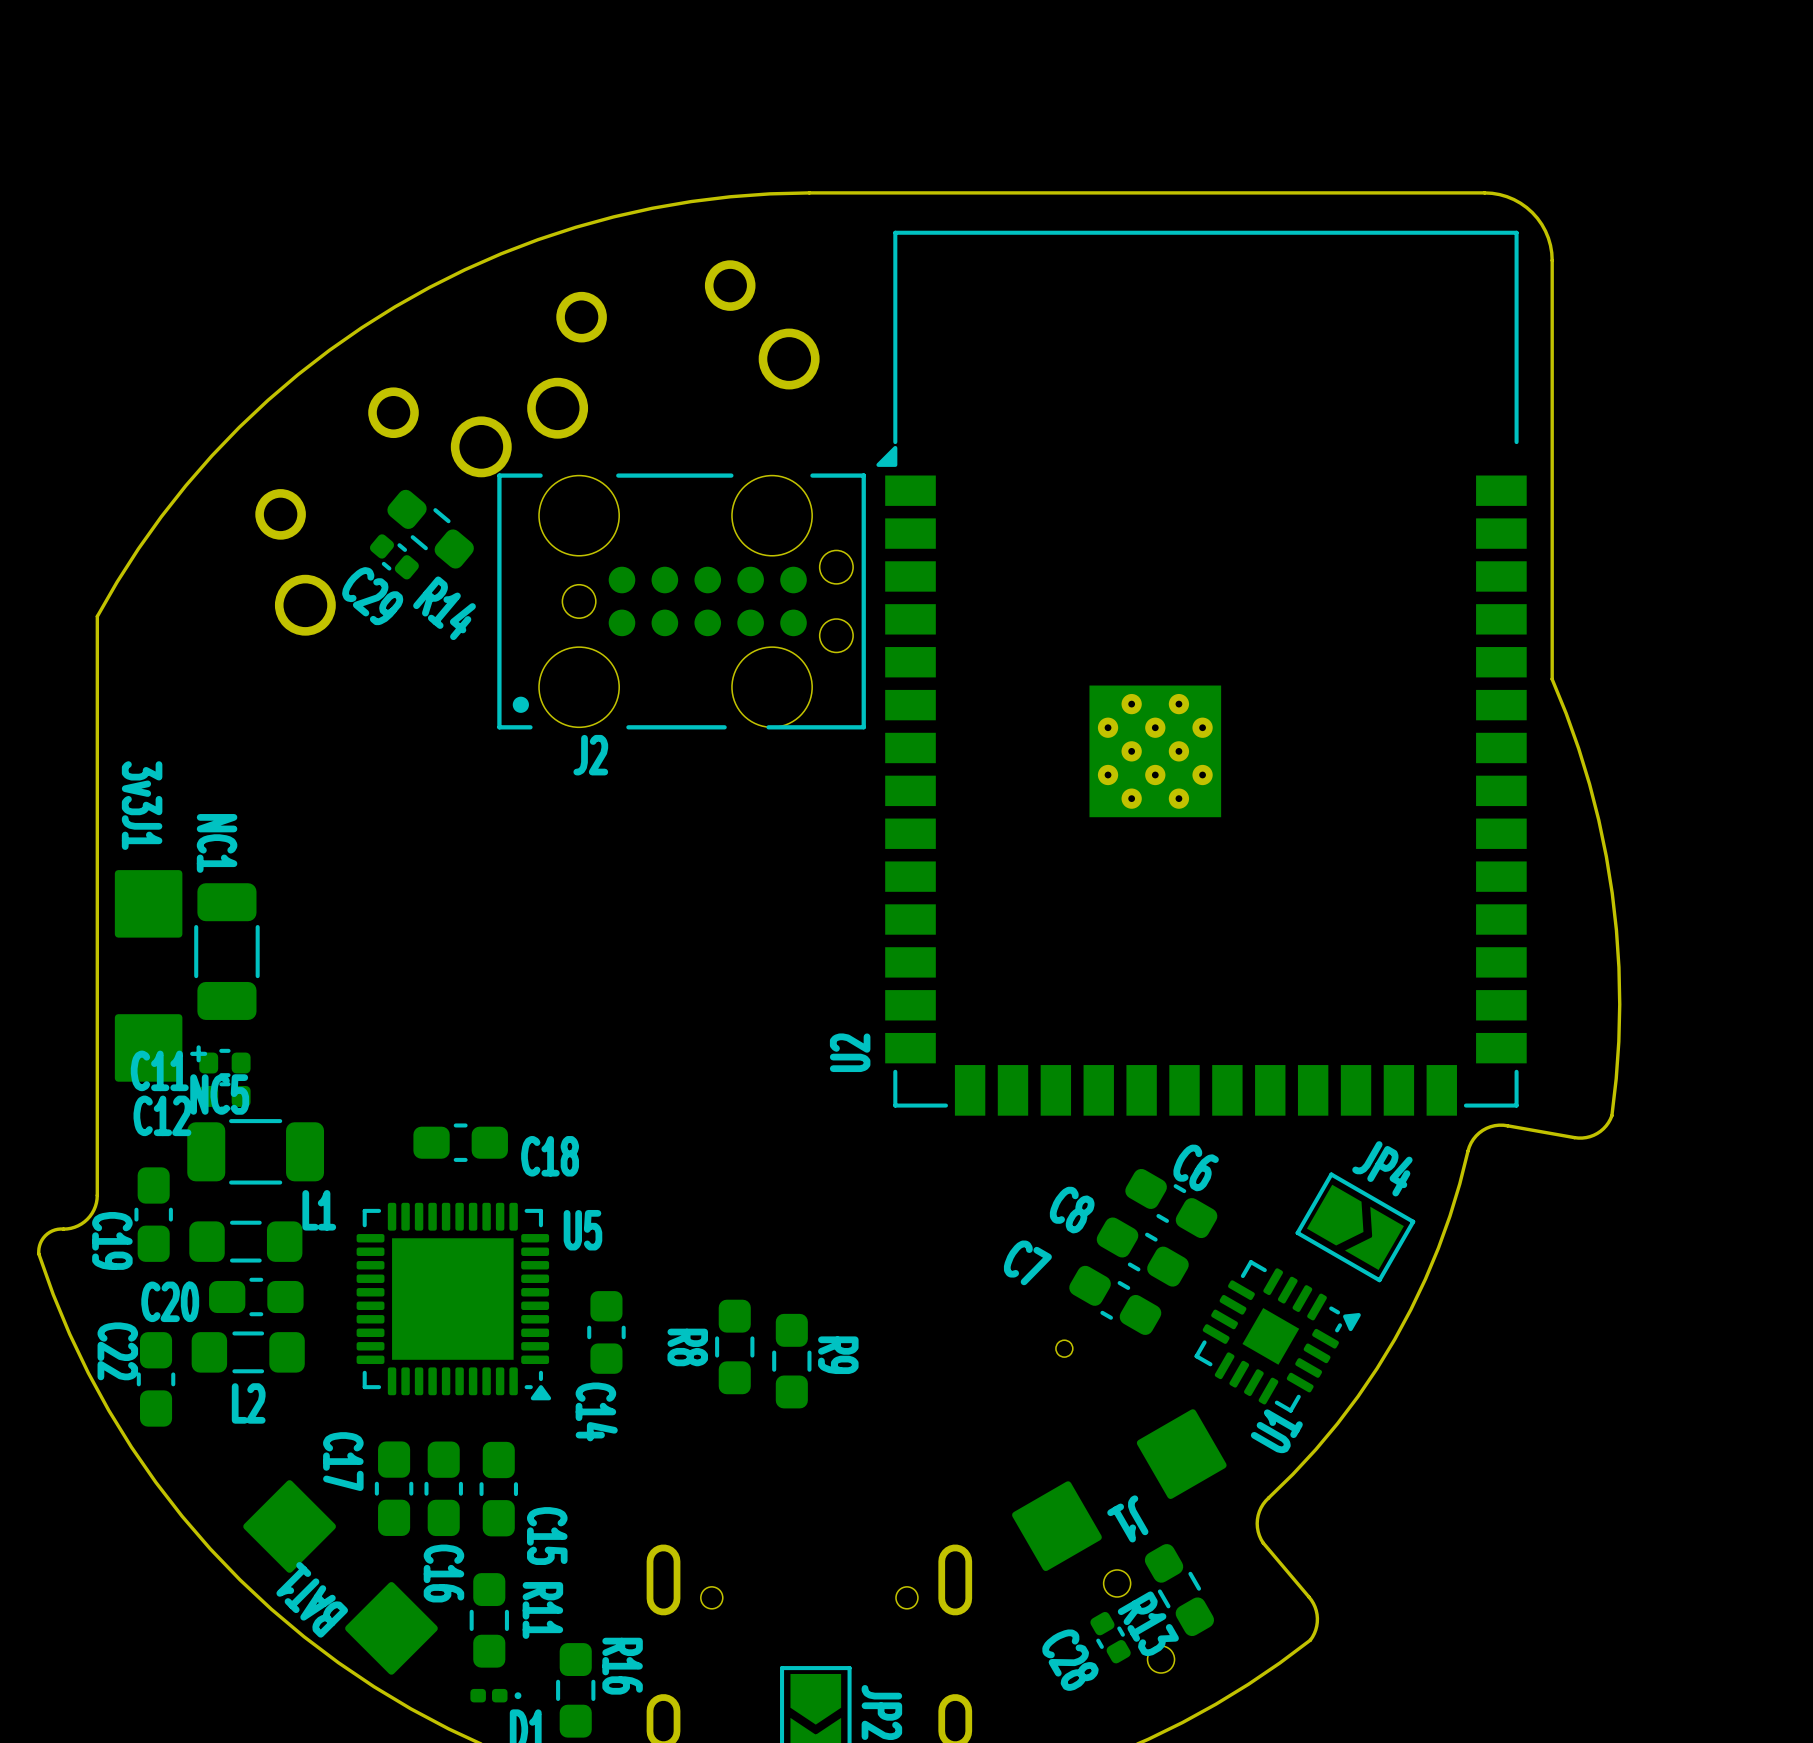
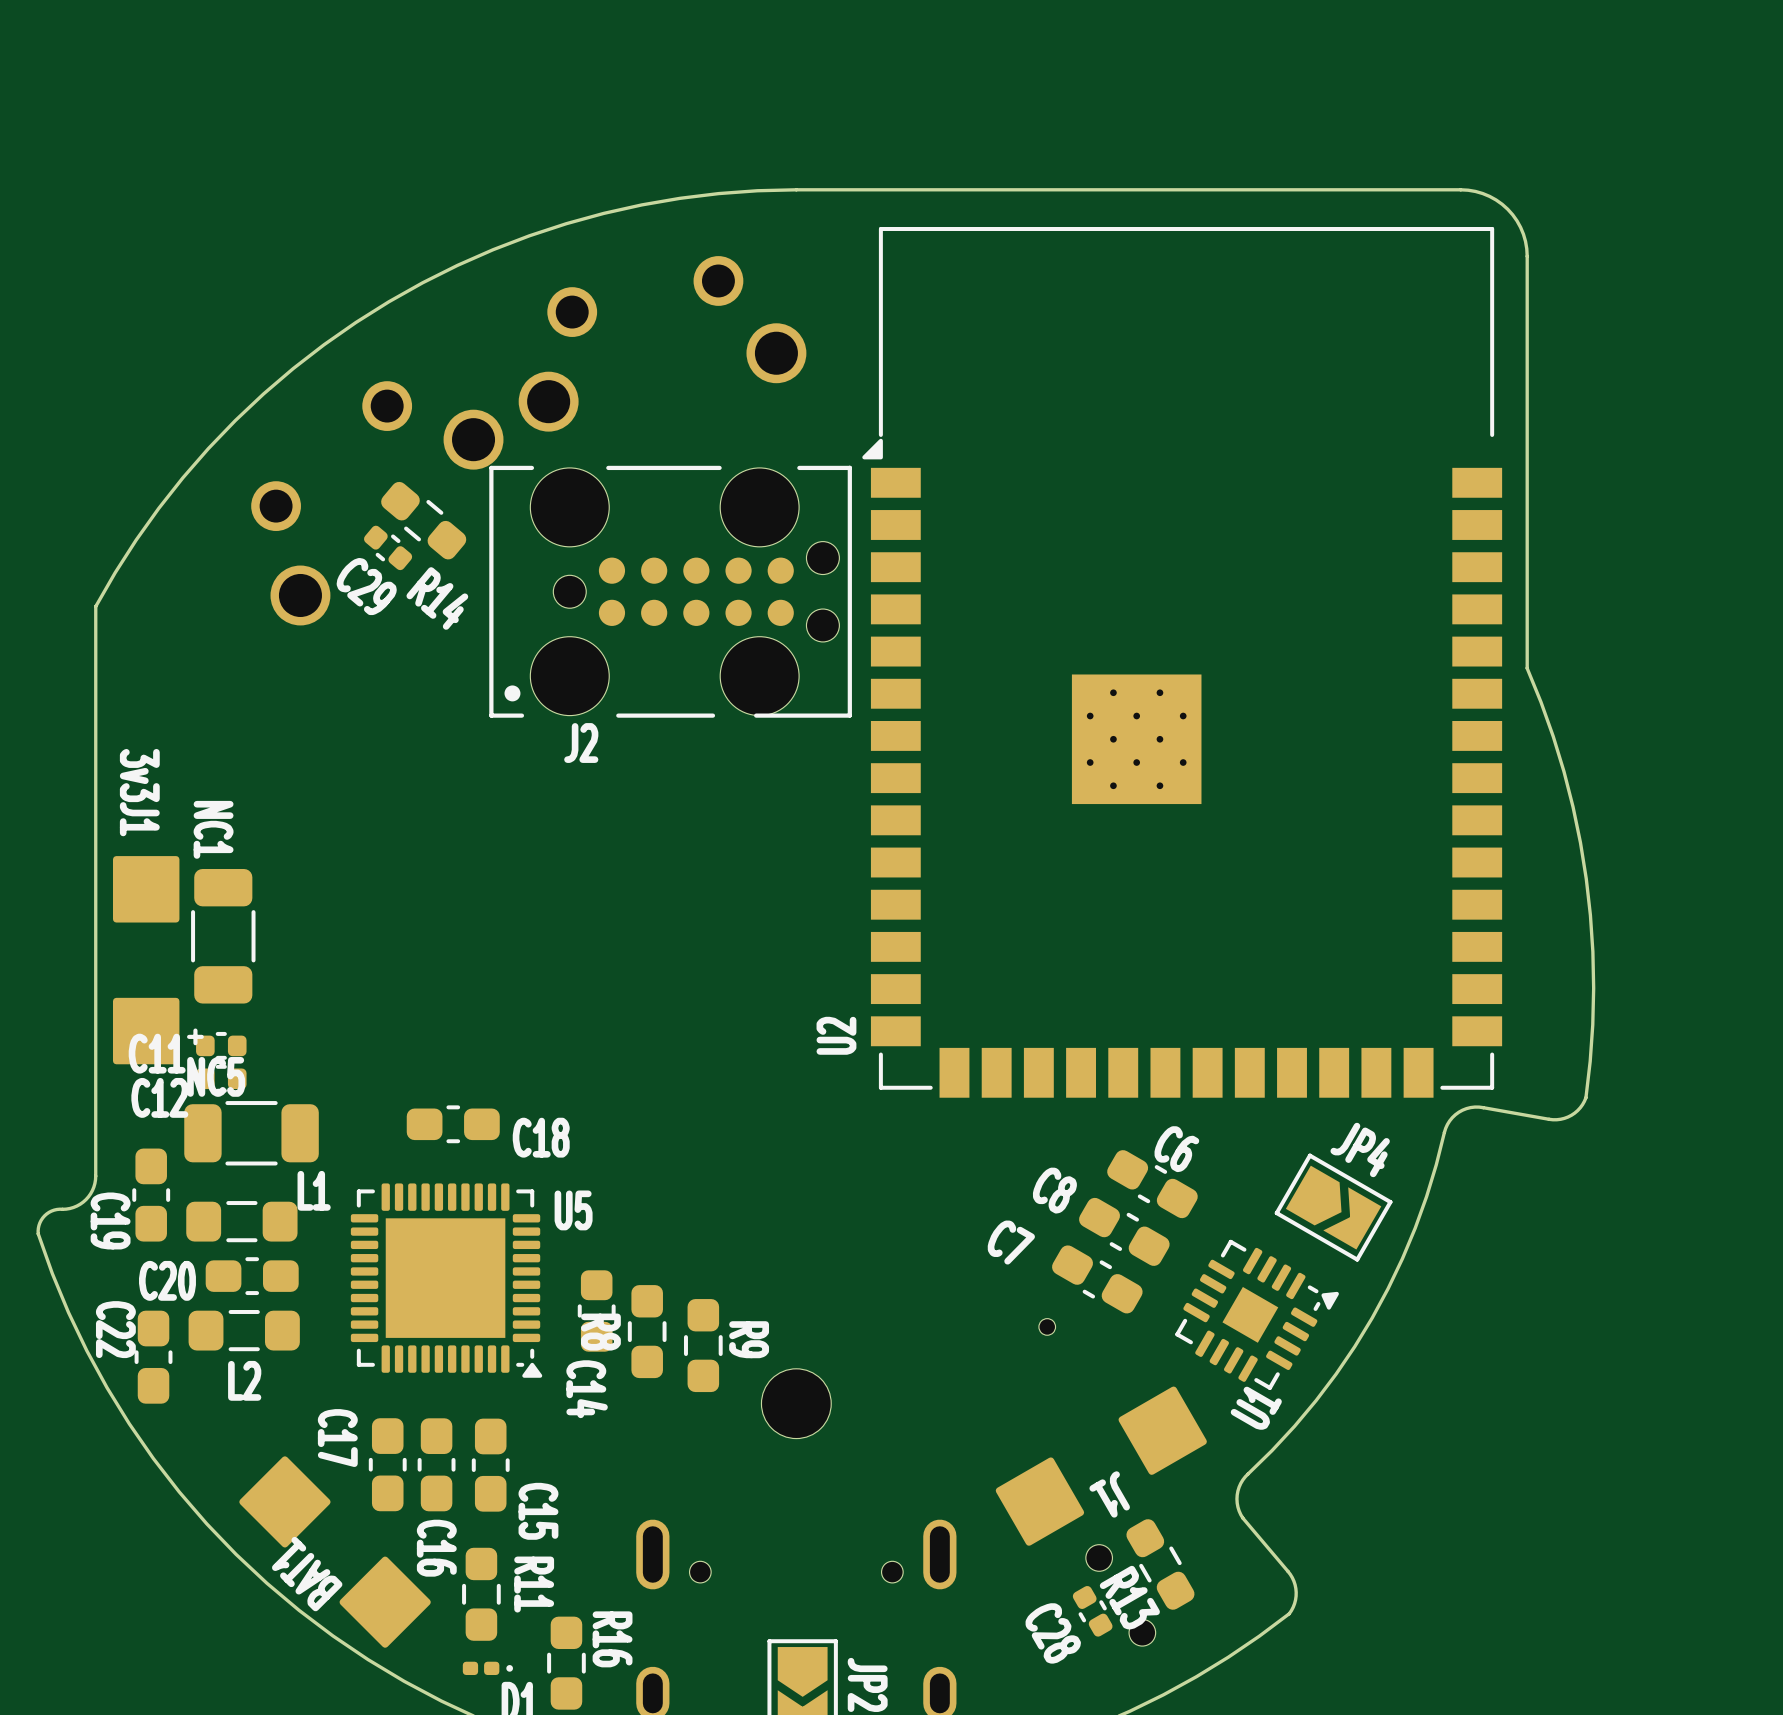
R8 position: (734, 1346) -> (647, 1331)
R9 position: (791, 1361) -> (703, 1345)
part: none -> (796, 1403)

